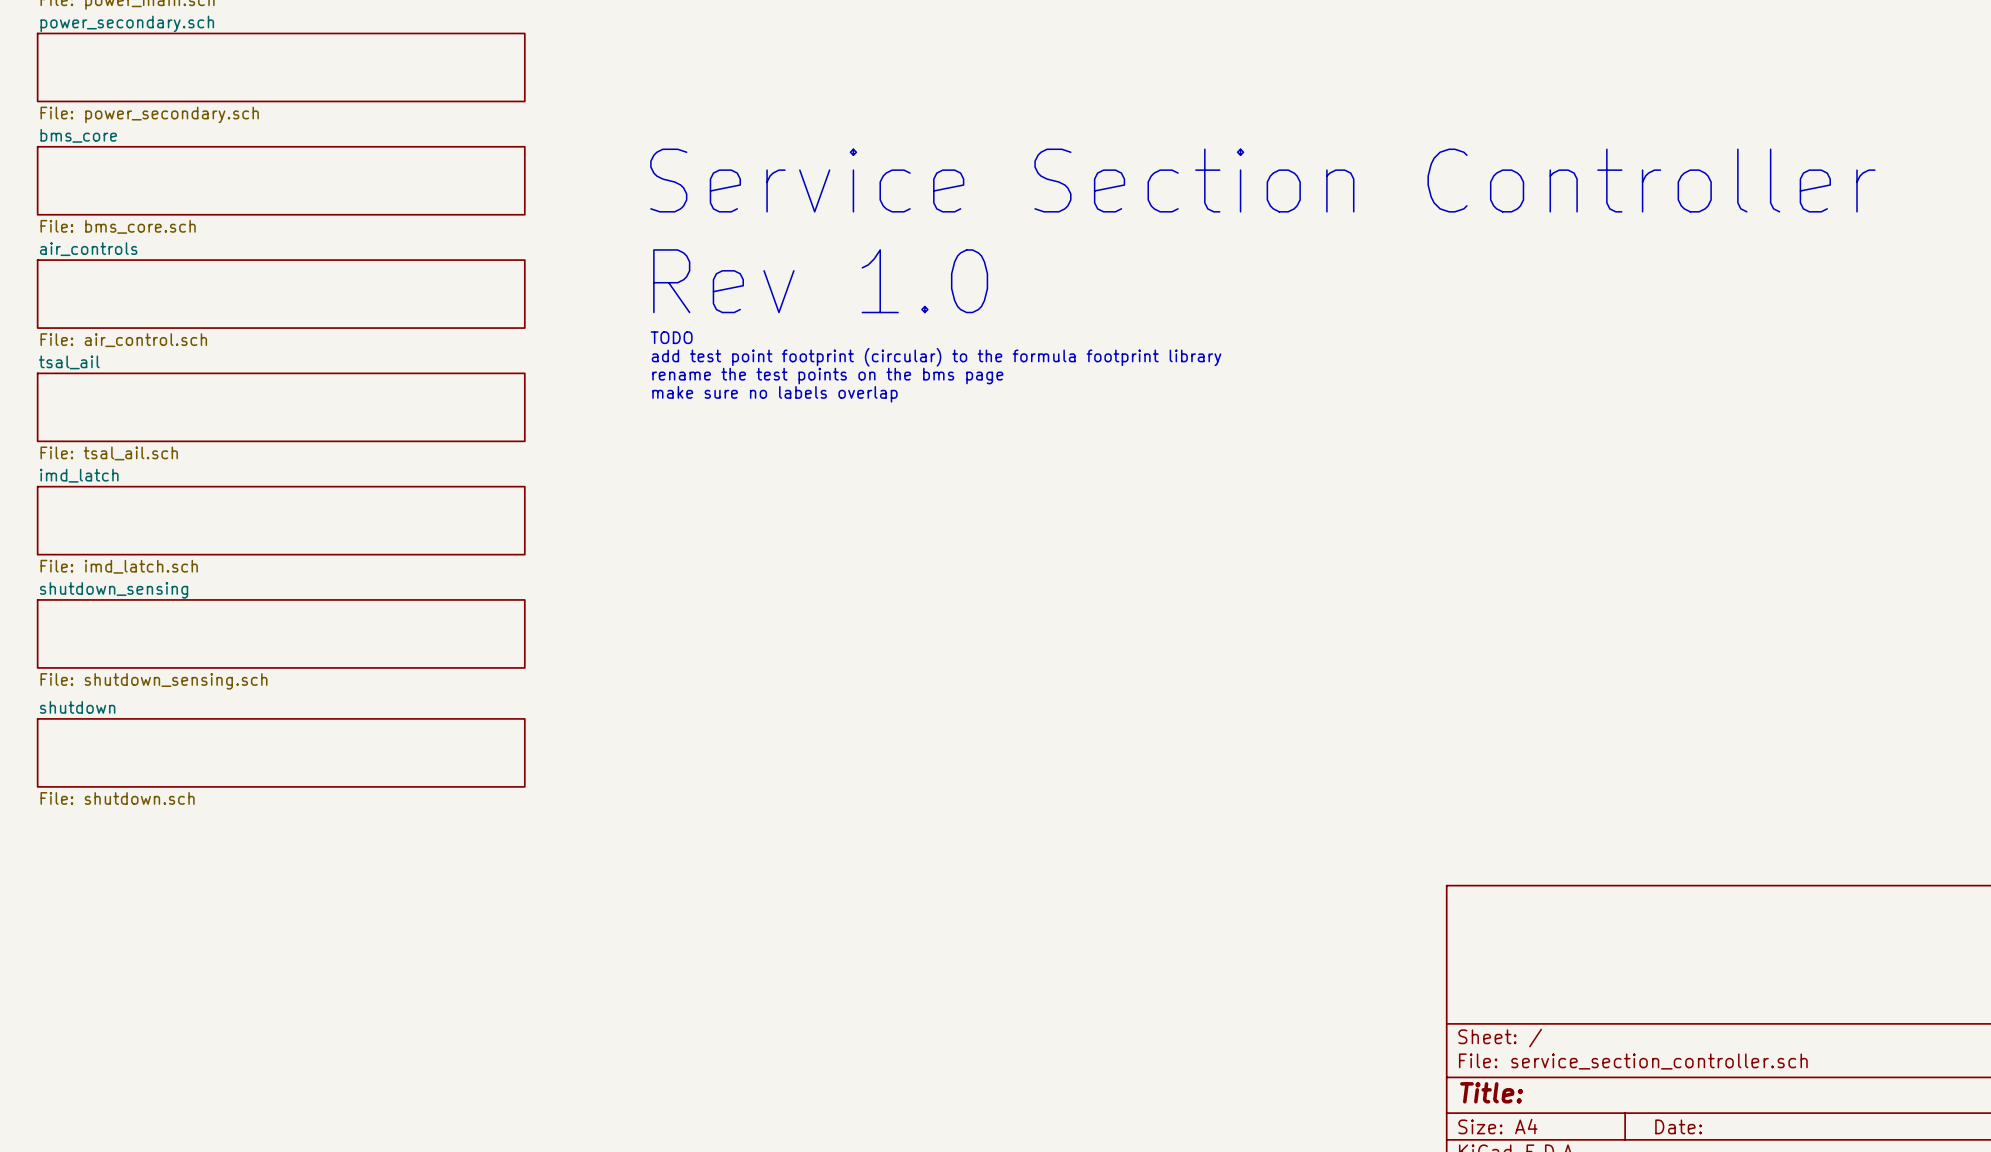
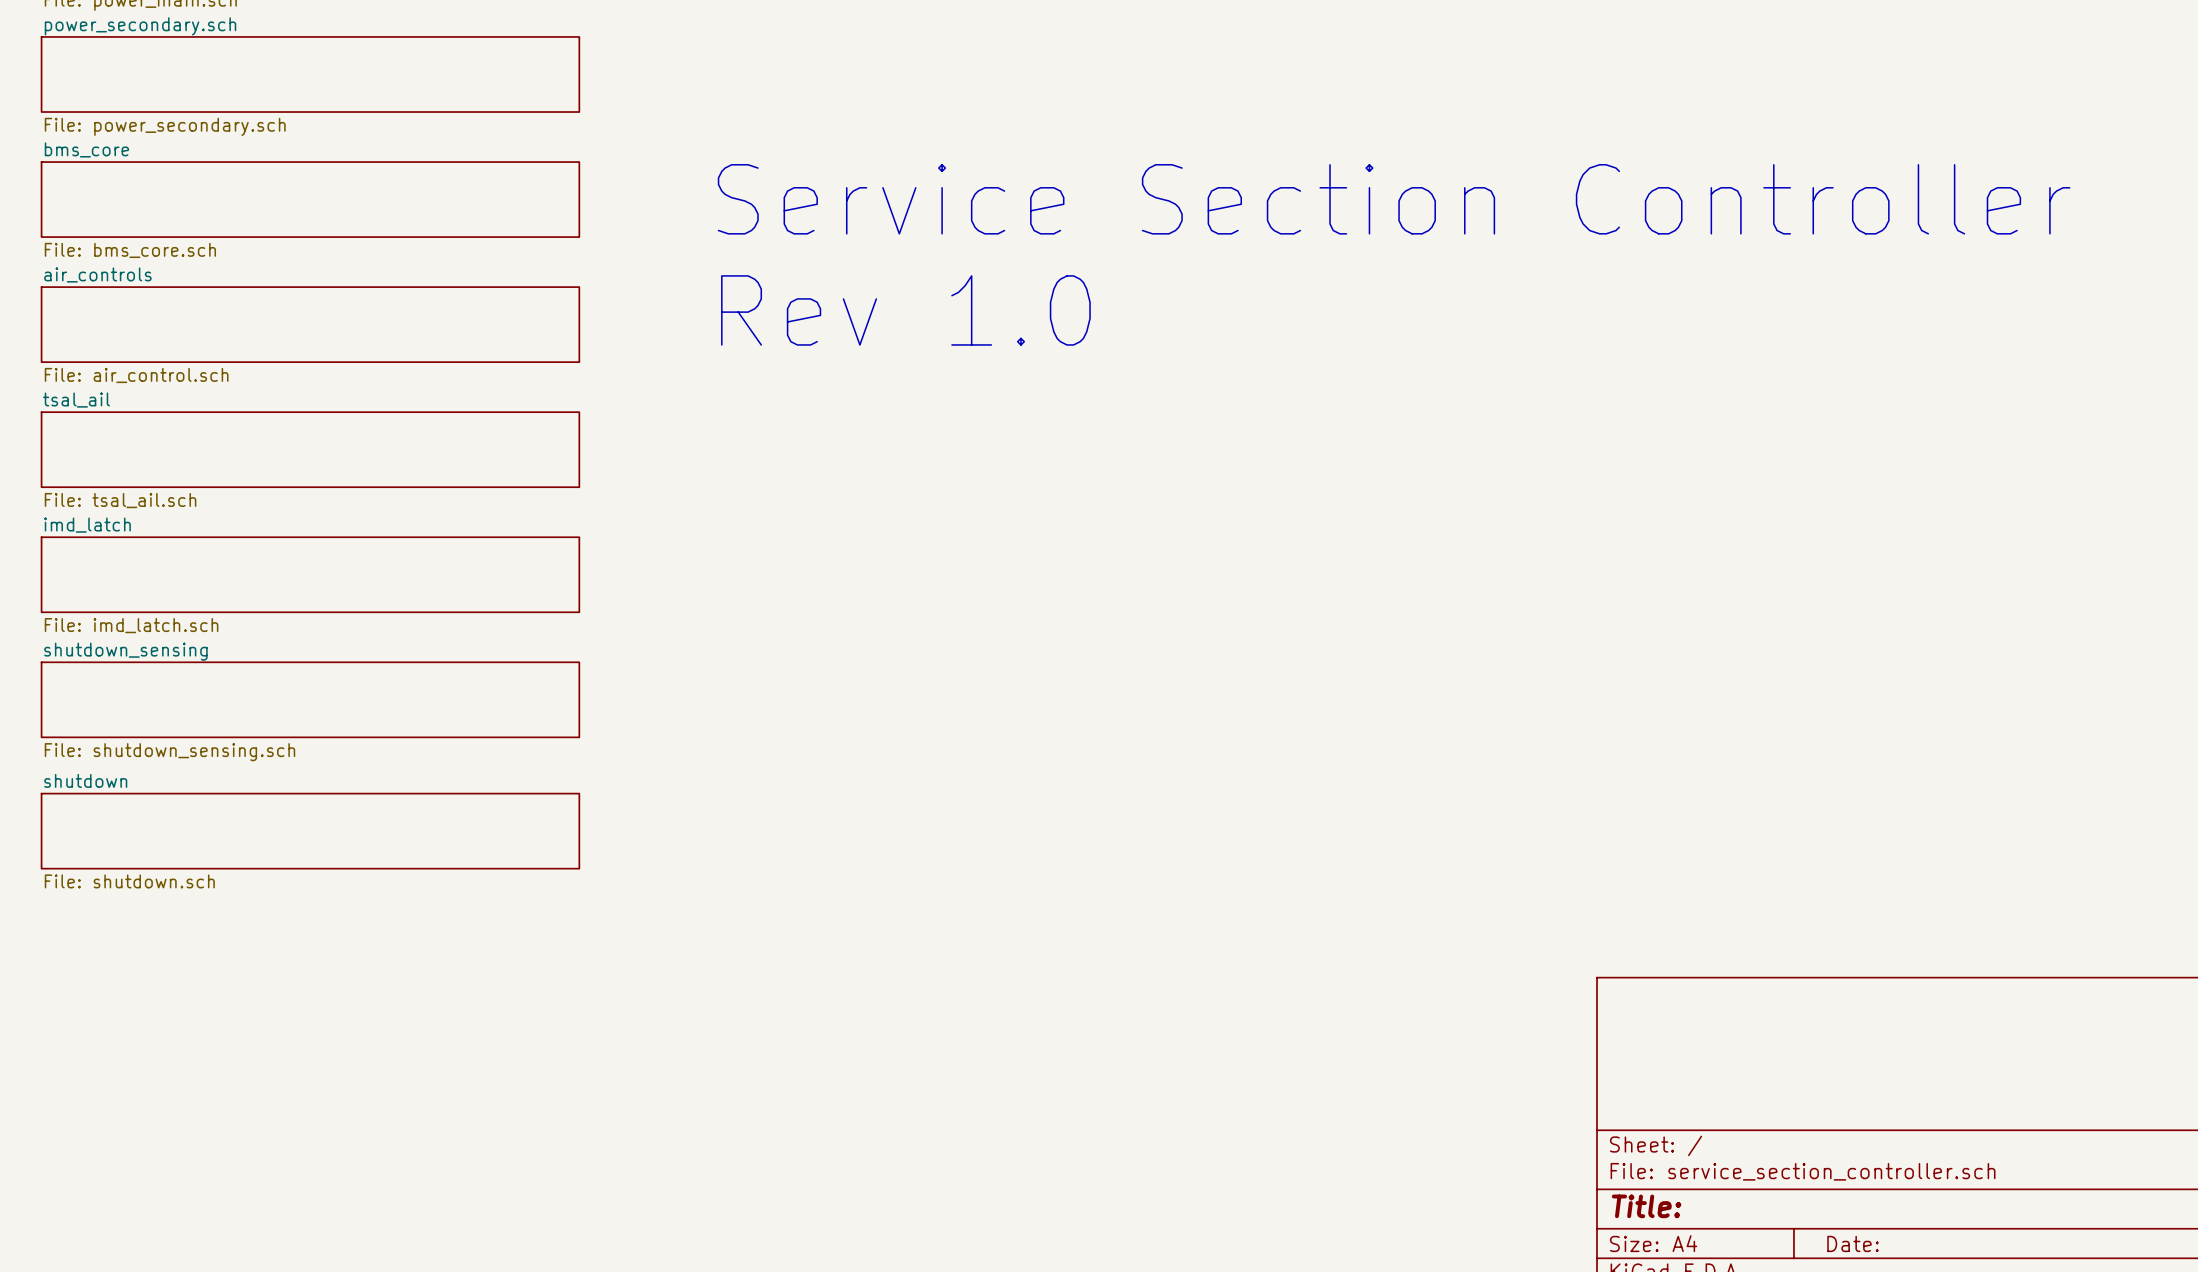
text: TODO (671, 337) -> none
text: add test point footprint (circular) to the formula footprint library (936, 357) -> none
text: rename the test points on the bms page (827, 376) -> none
text: make sure no labels overlap (774, 394) -> none

